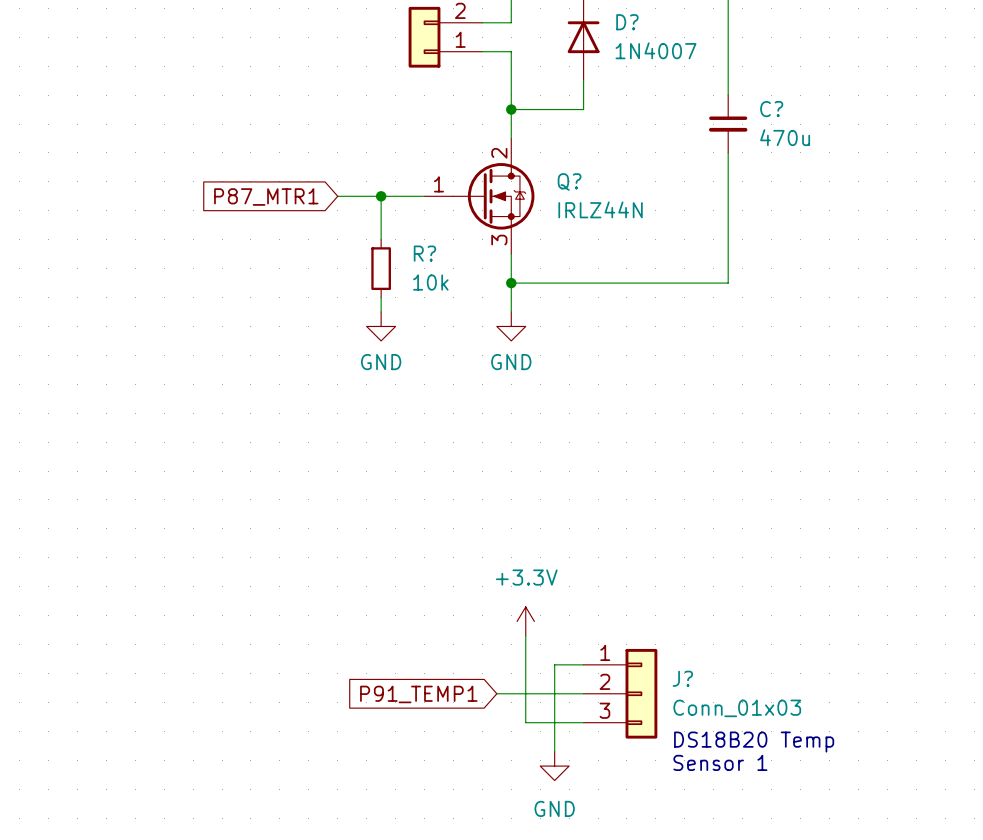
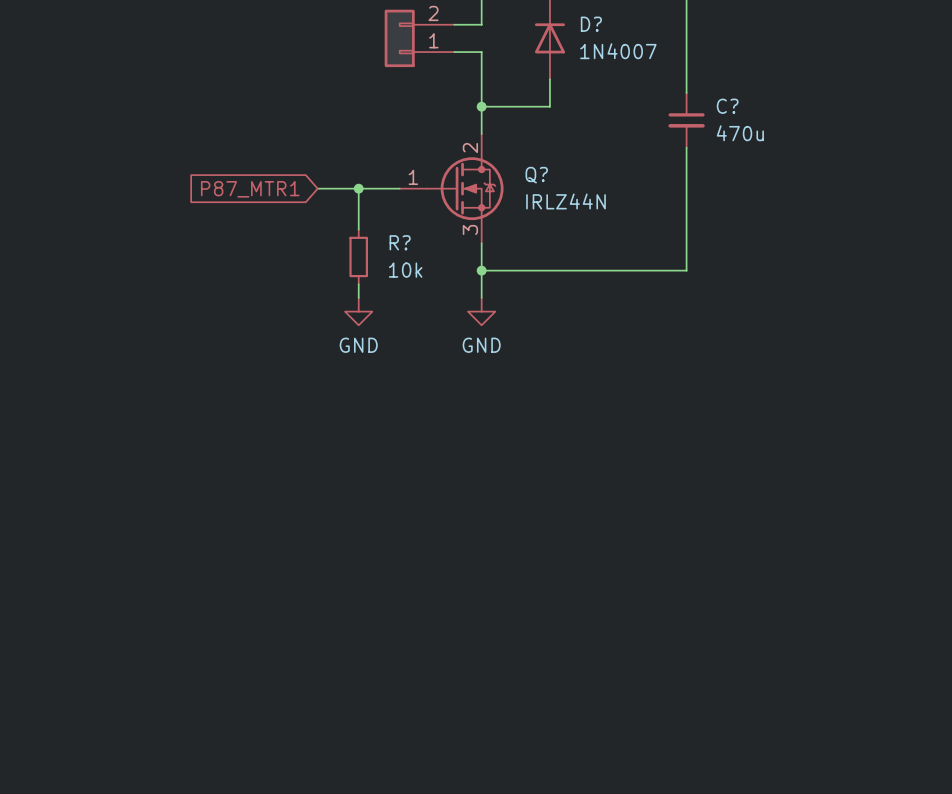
power symbol: +3.3V (525, 621) -> none
wire: (525, 635) (525, 722) (583, 722) -> none
wire: (583, 664) (554, 664) (554, 751) -> none
wire: (496, 693) (583, 693) -> none
J?: Conn_01x03 (620, 693) -> none
global label: P91_TEMP1 (418, 694) -> none
text: DS18B20 Temp (754, 742) -> none
text: Sensor 1 (720, 762) -> none
power symbol: GND (554, 766) -> none

